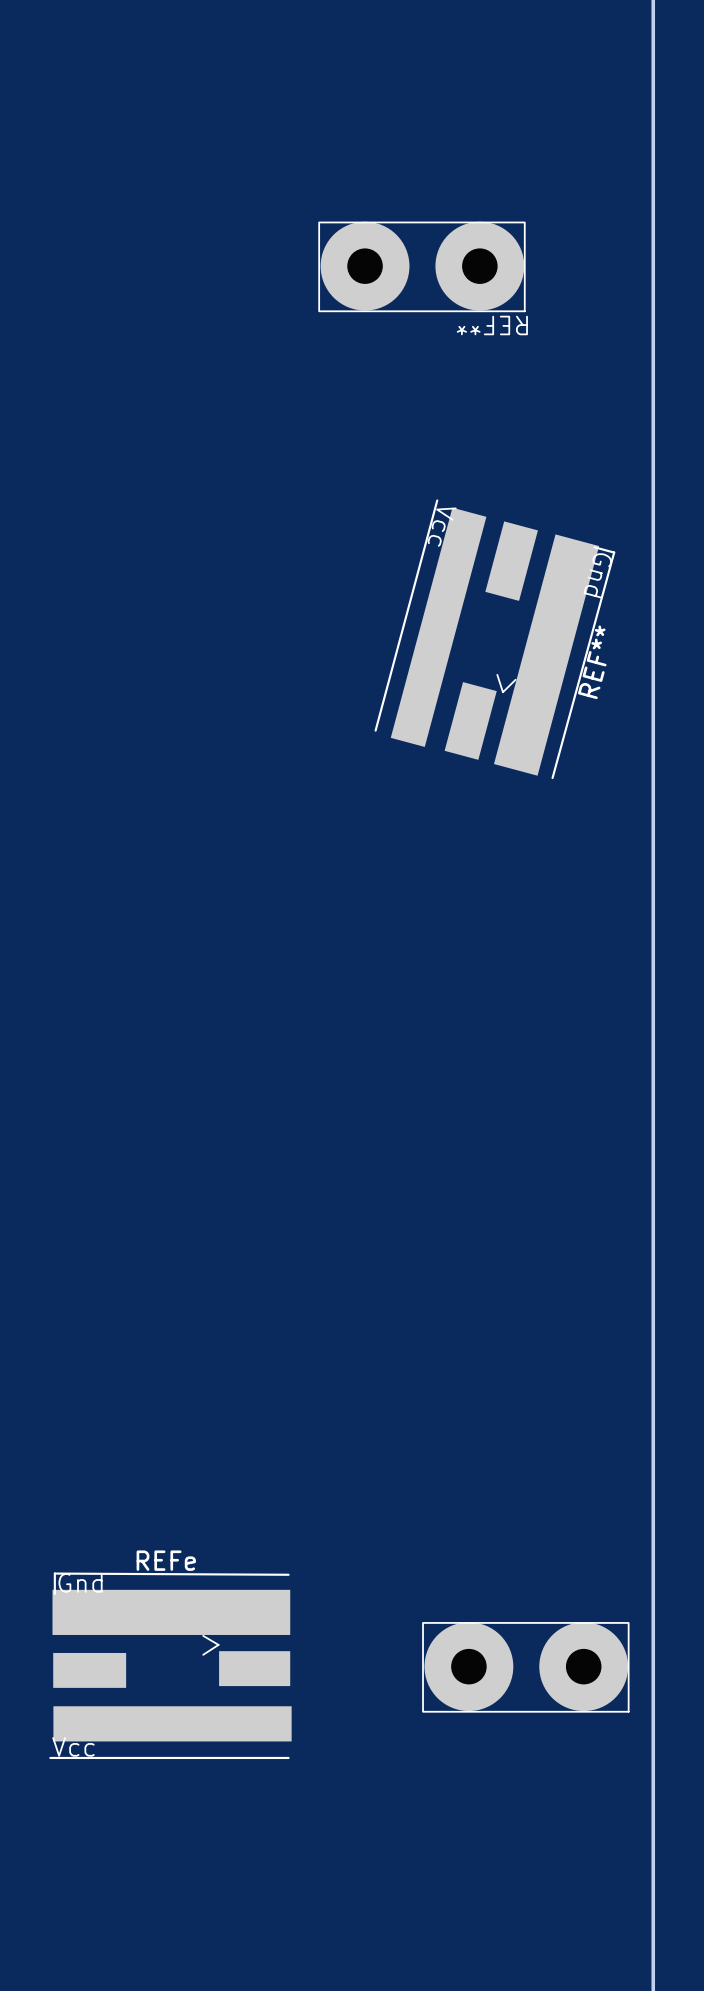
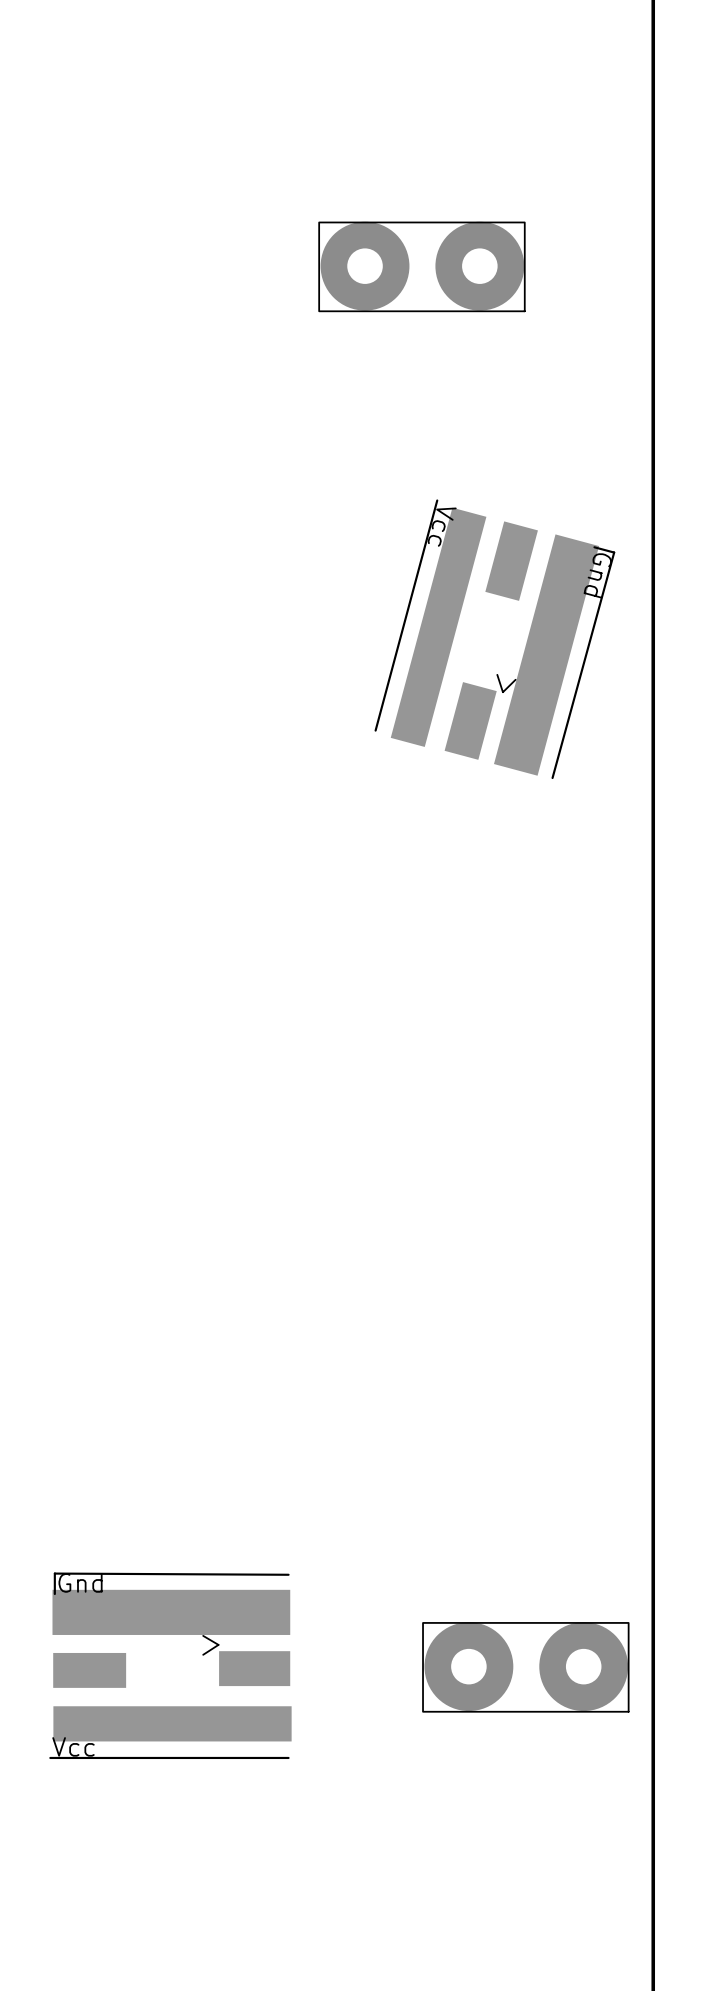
REF** name: REF** (492, 325) -> none
REF** name: REF** (592, 662) -> none
REFe name: REFe (166, 1560) -> none

